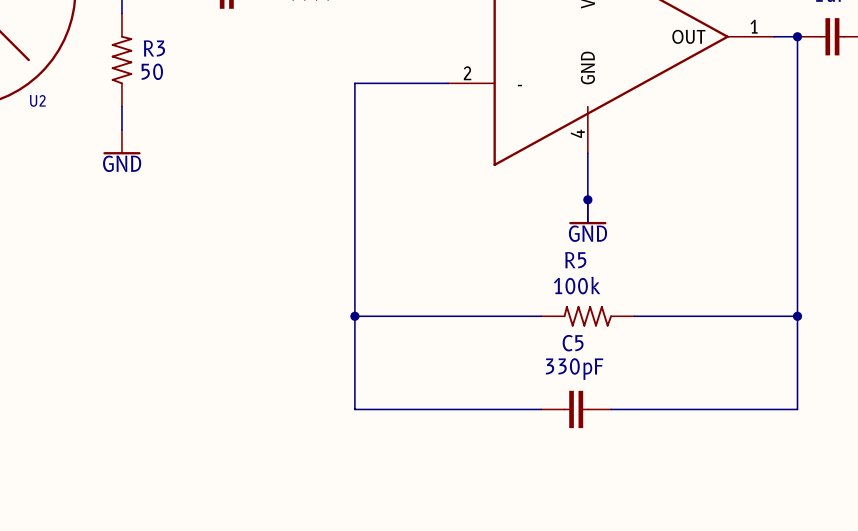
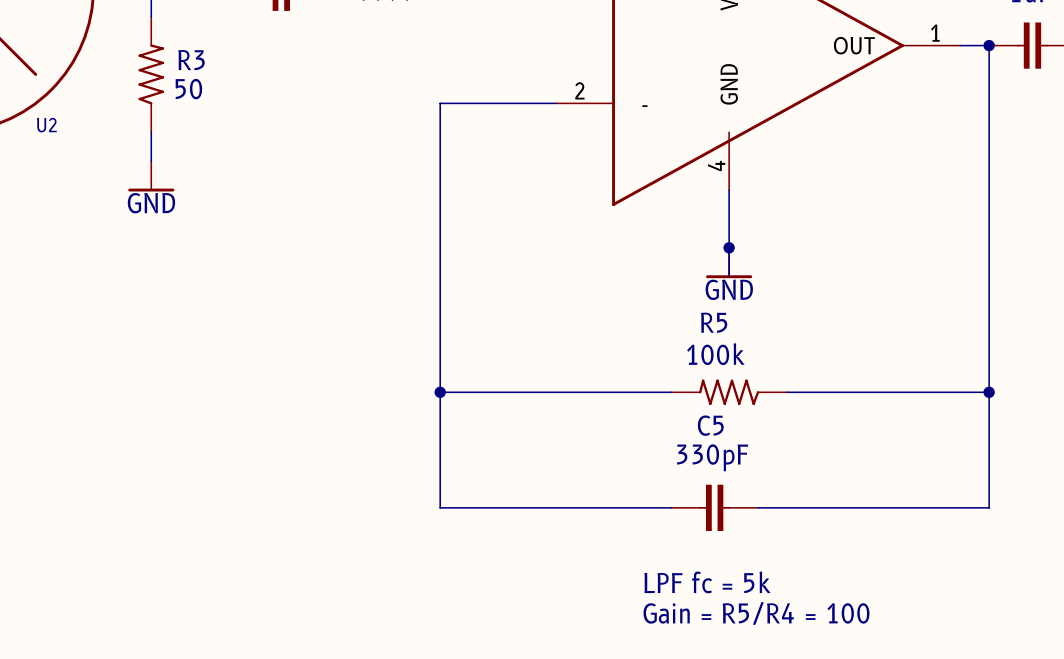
text: none -> LPF fc = 5k (707, 582)
text: none -> Gain = R5/R4 = 100 (756, 613)

